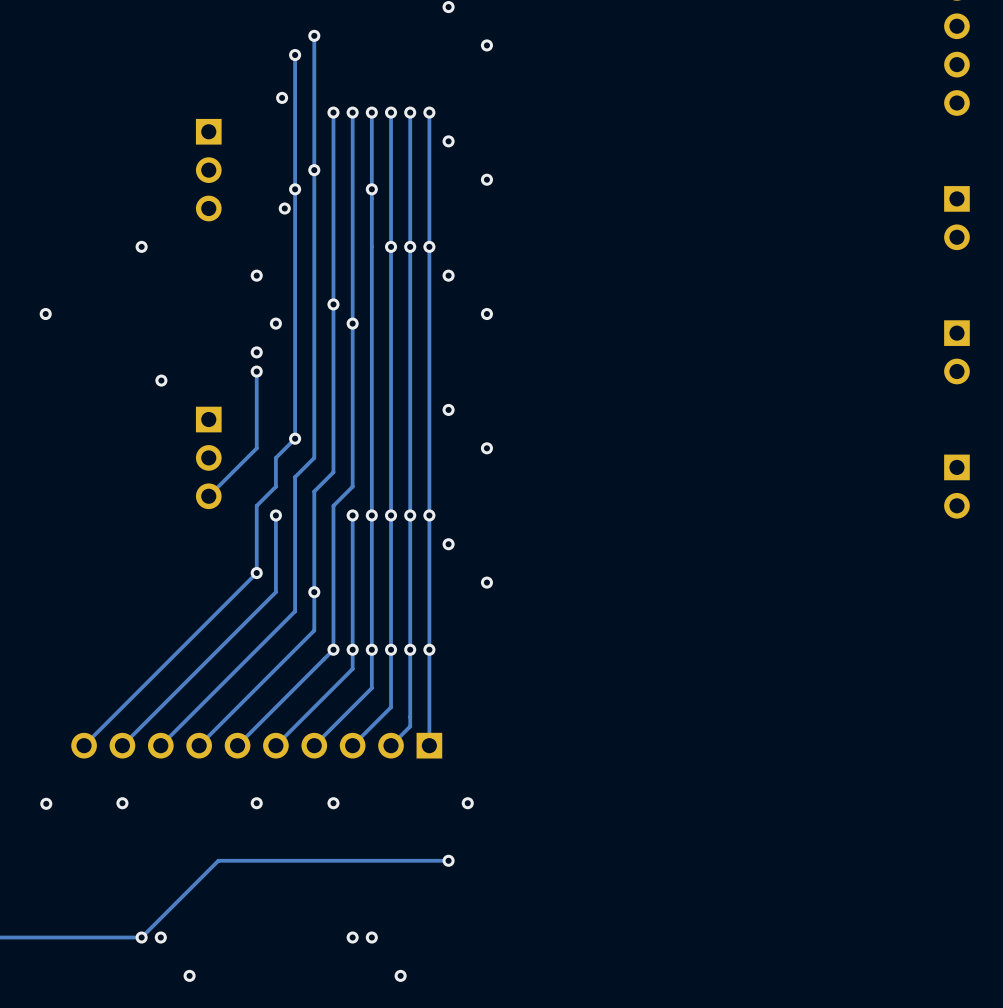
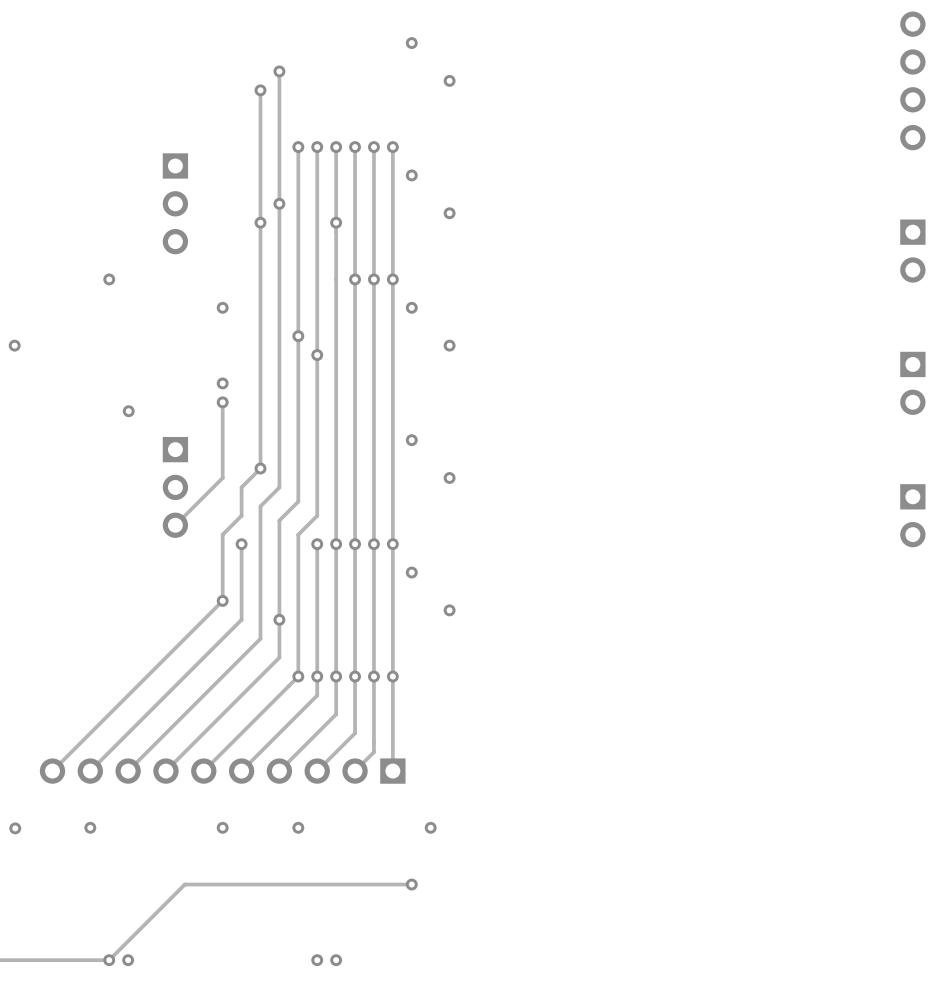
via: (282, 97) -> none
via: (284, 208) -> none
via: (275, 323) -> none

